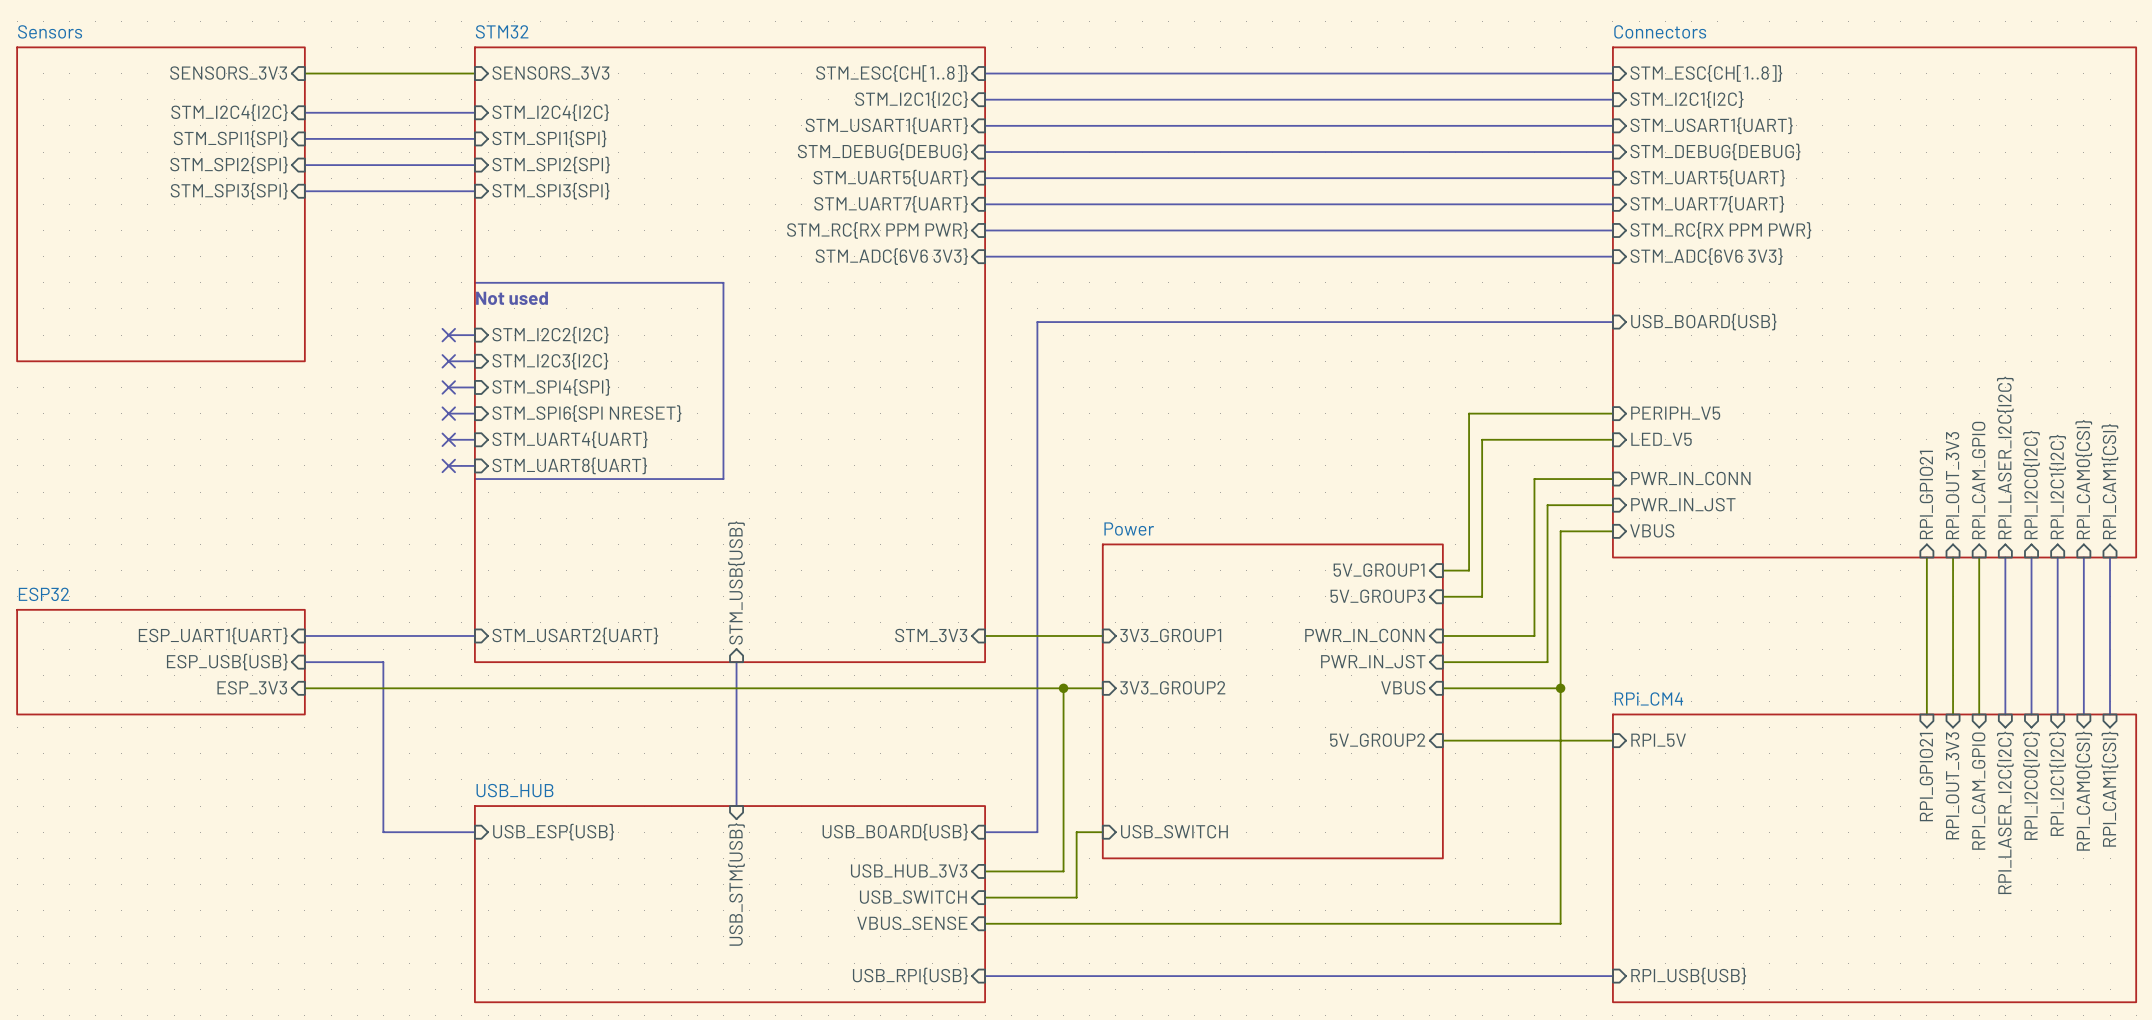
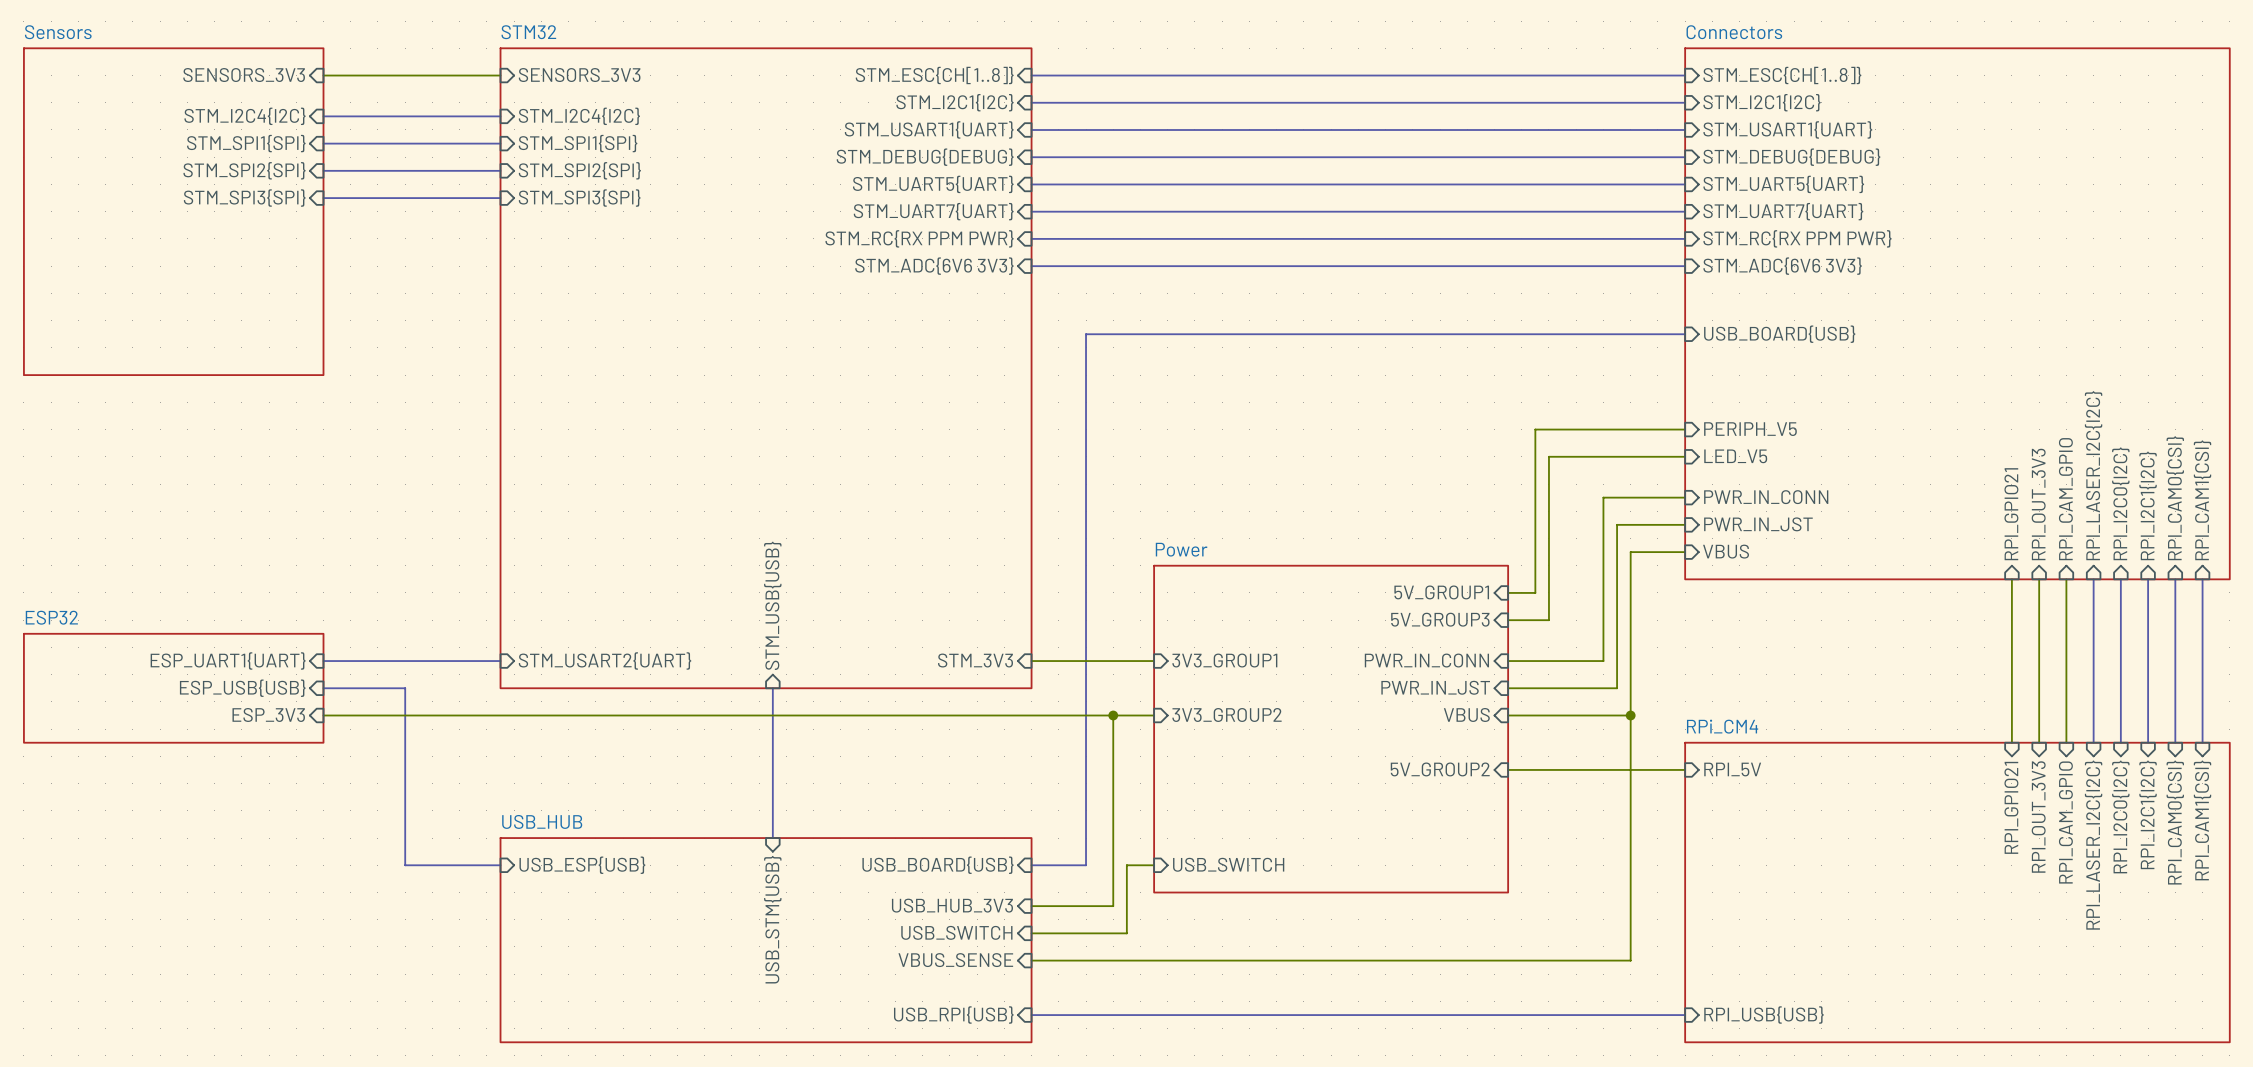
line: (474, 282) (723, 282) (723, 479) (474, 479) -> none
text: Not used (512, 298) -> none
bus: (448, 335) (474, 335) -> none
no-connect mark: (448, 335) -> none
sheet pin: STM_I2C2{I2C} (550, 335) -> none
bus: (448, 361) (474, 361) -> none
no-connect mark: (448, 361) -> none
sheet pin: STM_I2C3{I2C} (550, 361) -> none
bus: (448, 387) (474, 387) -> none
no-connect mark: (448, 387) -> none
sheet pin: STM_SPI4{SPI} (551, 387) -> none
bus: (448, 413) (474, 413) -> none
no-connect mark: (448, 413) -> none
sheet pin: STM_SPI6{SPI NRESET} (586, 413) -> none
bus: (448, 439) (474, 439) -> none
no-connect mark: (448, 439) -> none
sheet pin: STM_UART4{UART} (570, 439) -> none
bus: (448, 465) (474, 465) -> none
no-connect mark: (448, 465) -> none
sheet pin: STM_UART8{UART} (569, 465) -> none

